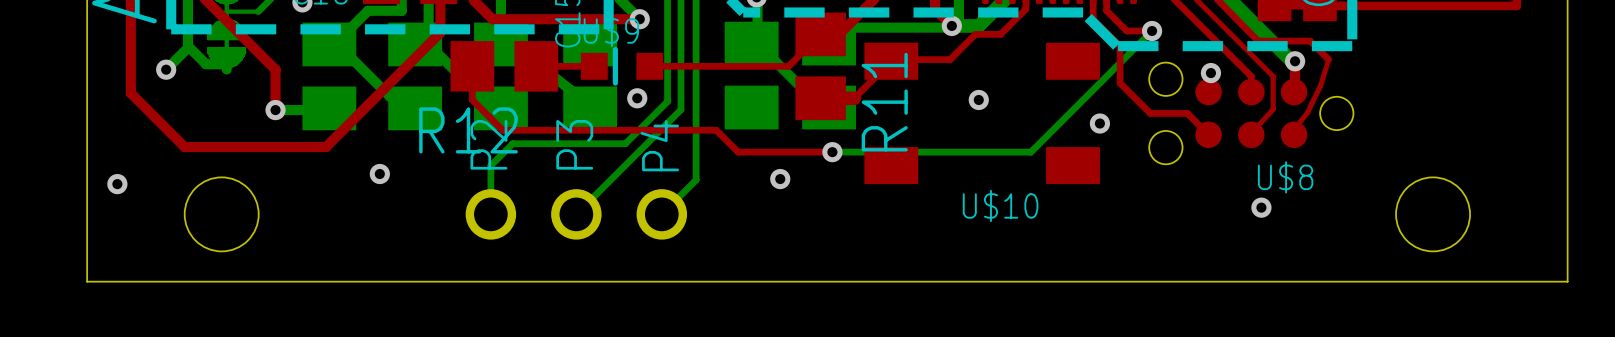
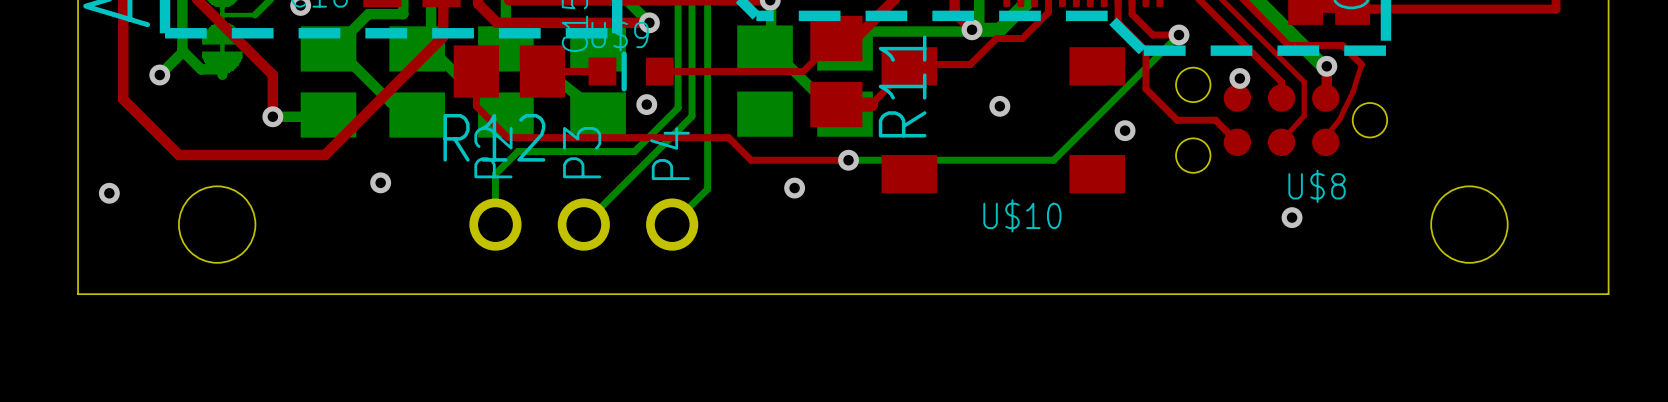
R11 name position: R11 (884, 102) -> R11 (902, 86)
R12 name position: R12 (468, 130) -> R12 (494, 137)

